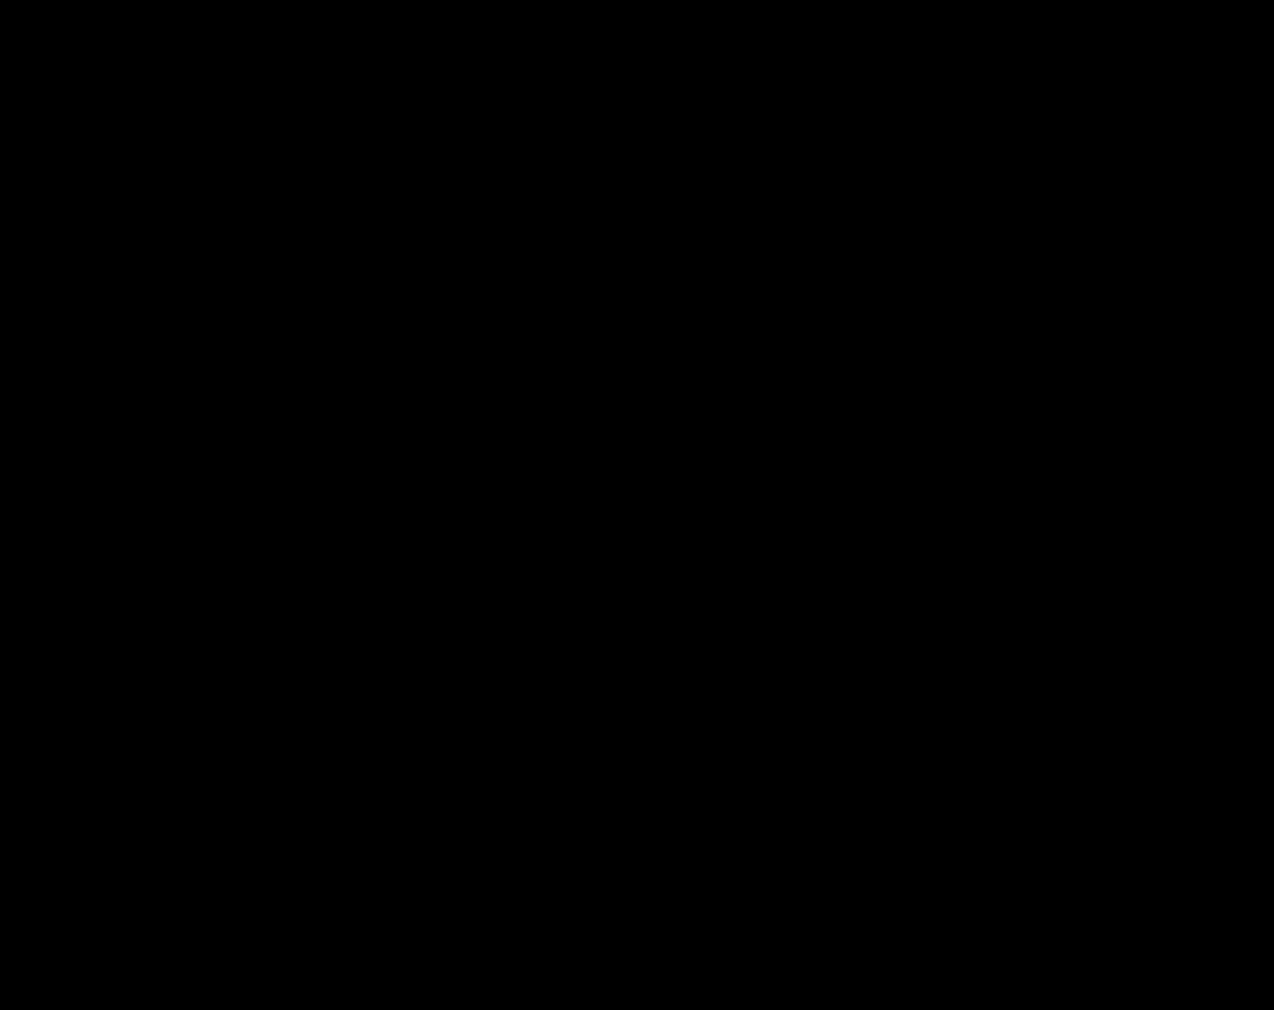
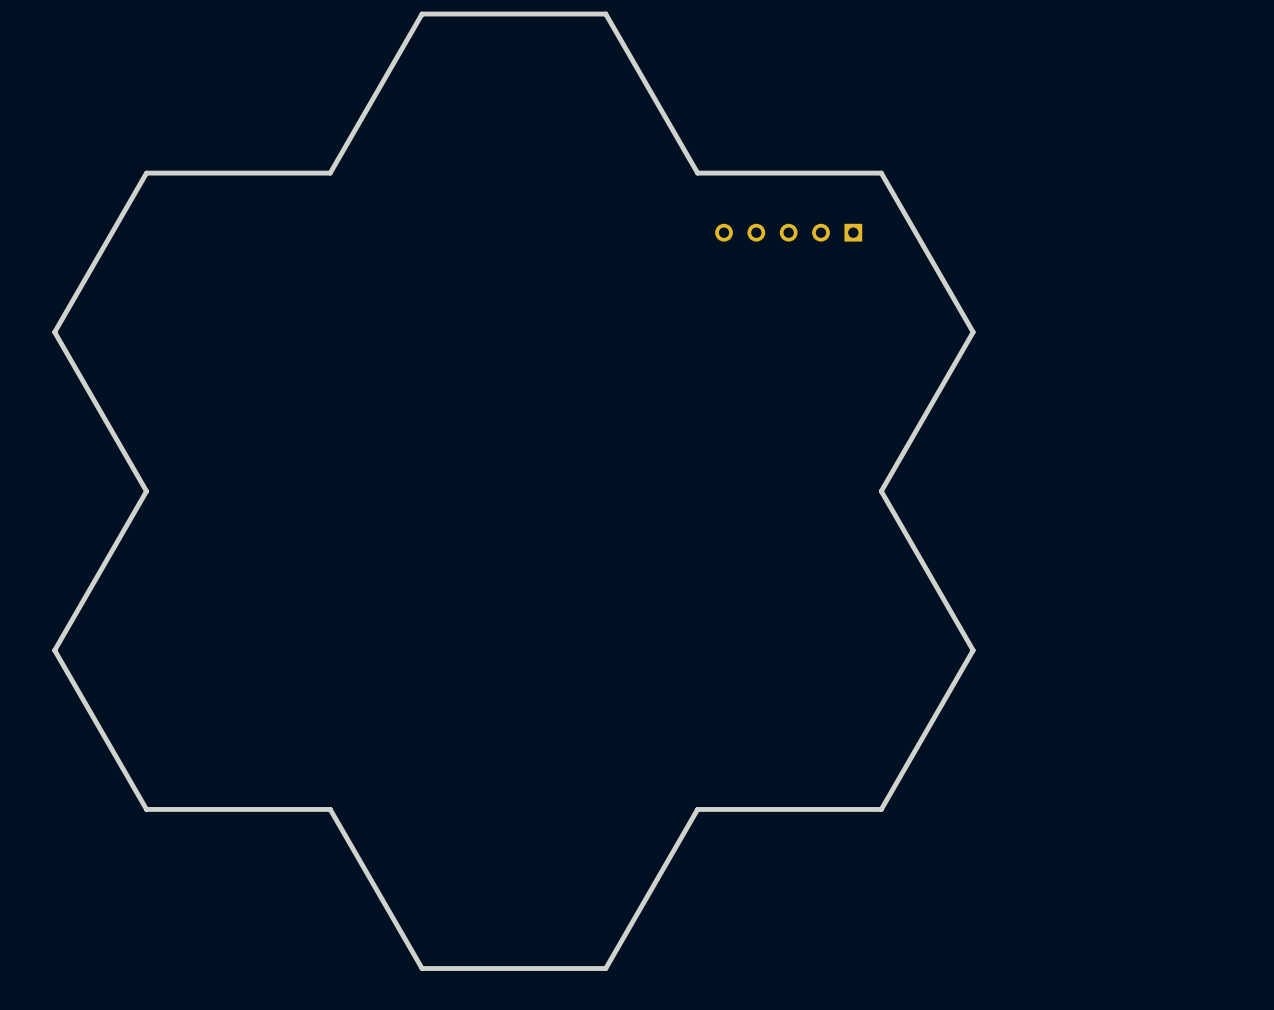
board edge: none -> (605, 14) (422, 14) (330, 173) (146, 173) (54, 332) (146, 491) (54, 650) (146, 809) (330, 809) (422, 968) (605, 968) (697, 809) (881, 809) (973, 650) (881, 491) (973, 332) (881, 173) (697, 173) (605, 14)
part: none -> (788, 232)

